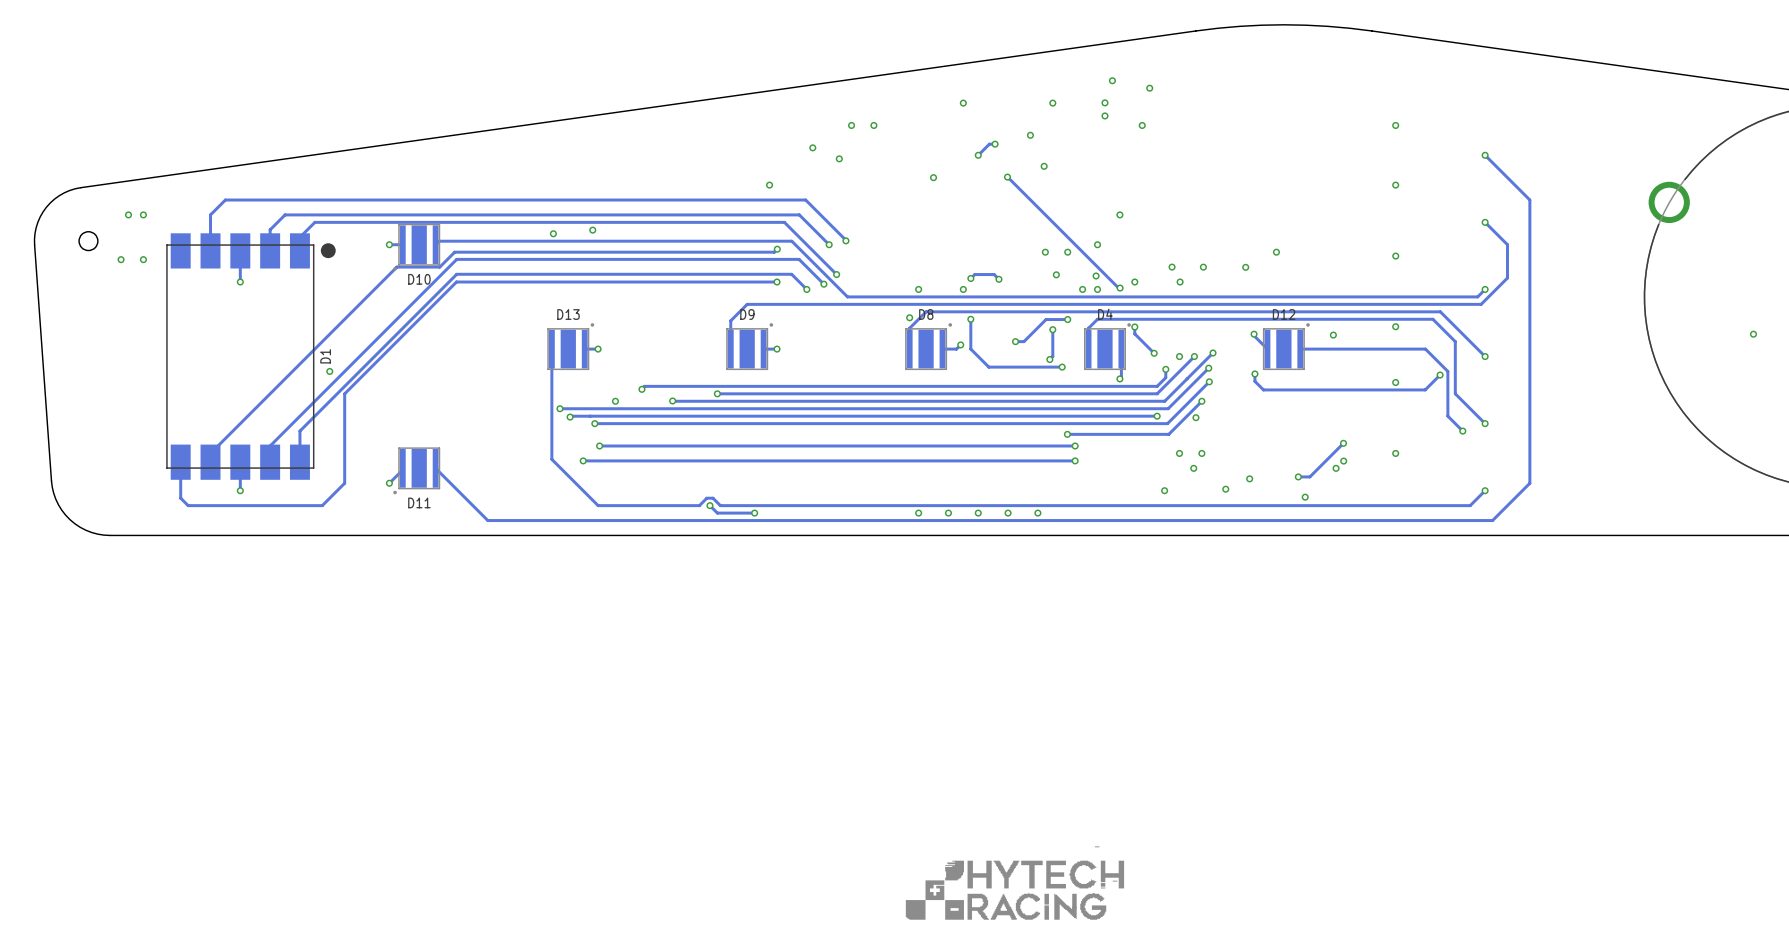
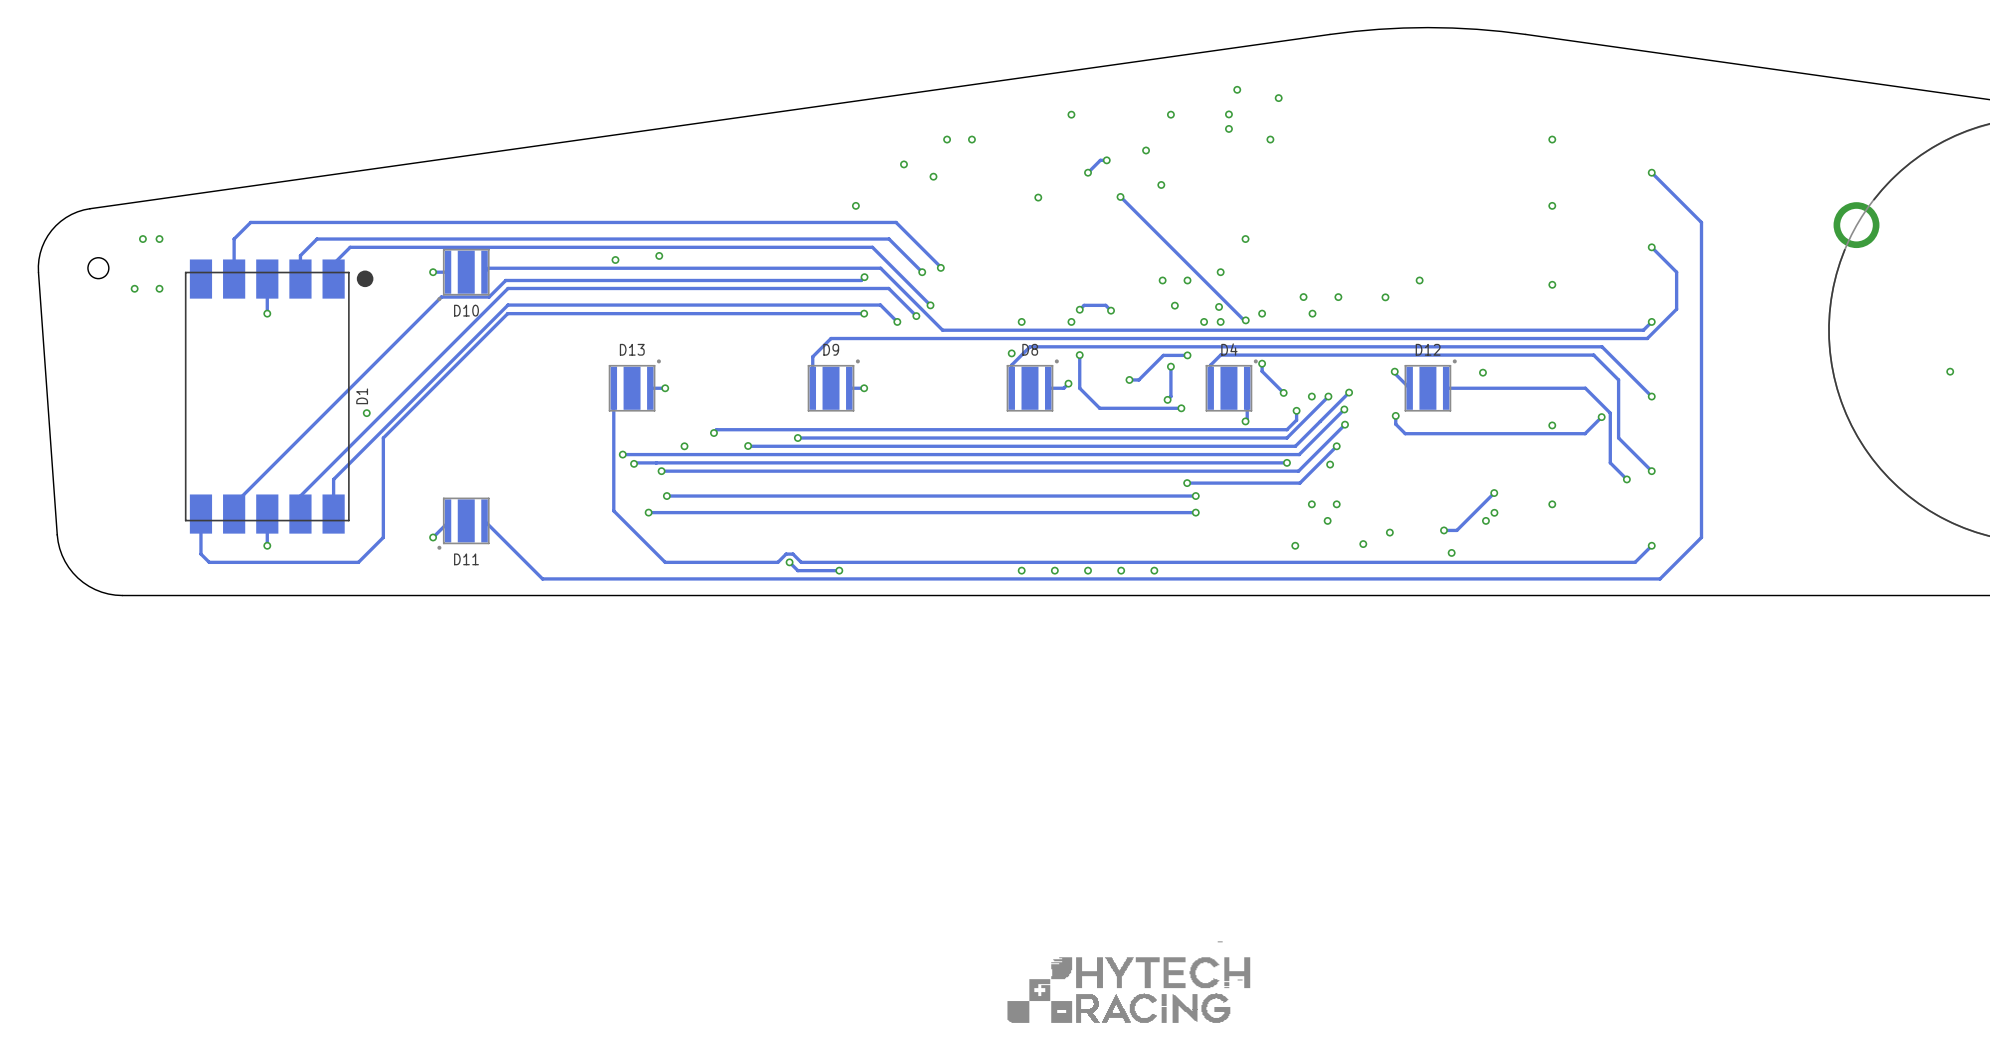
via: (1395, 326) -> none

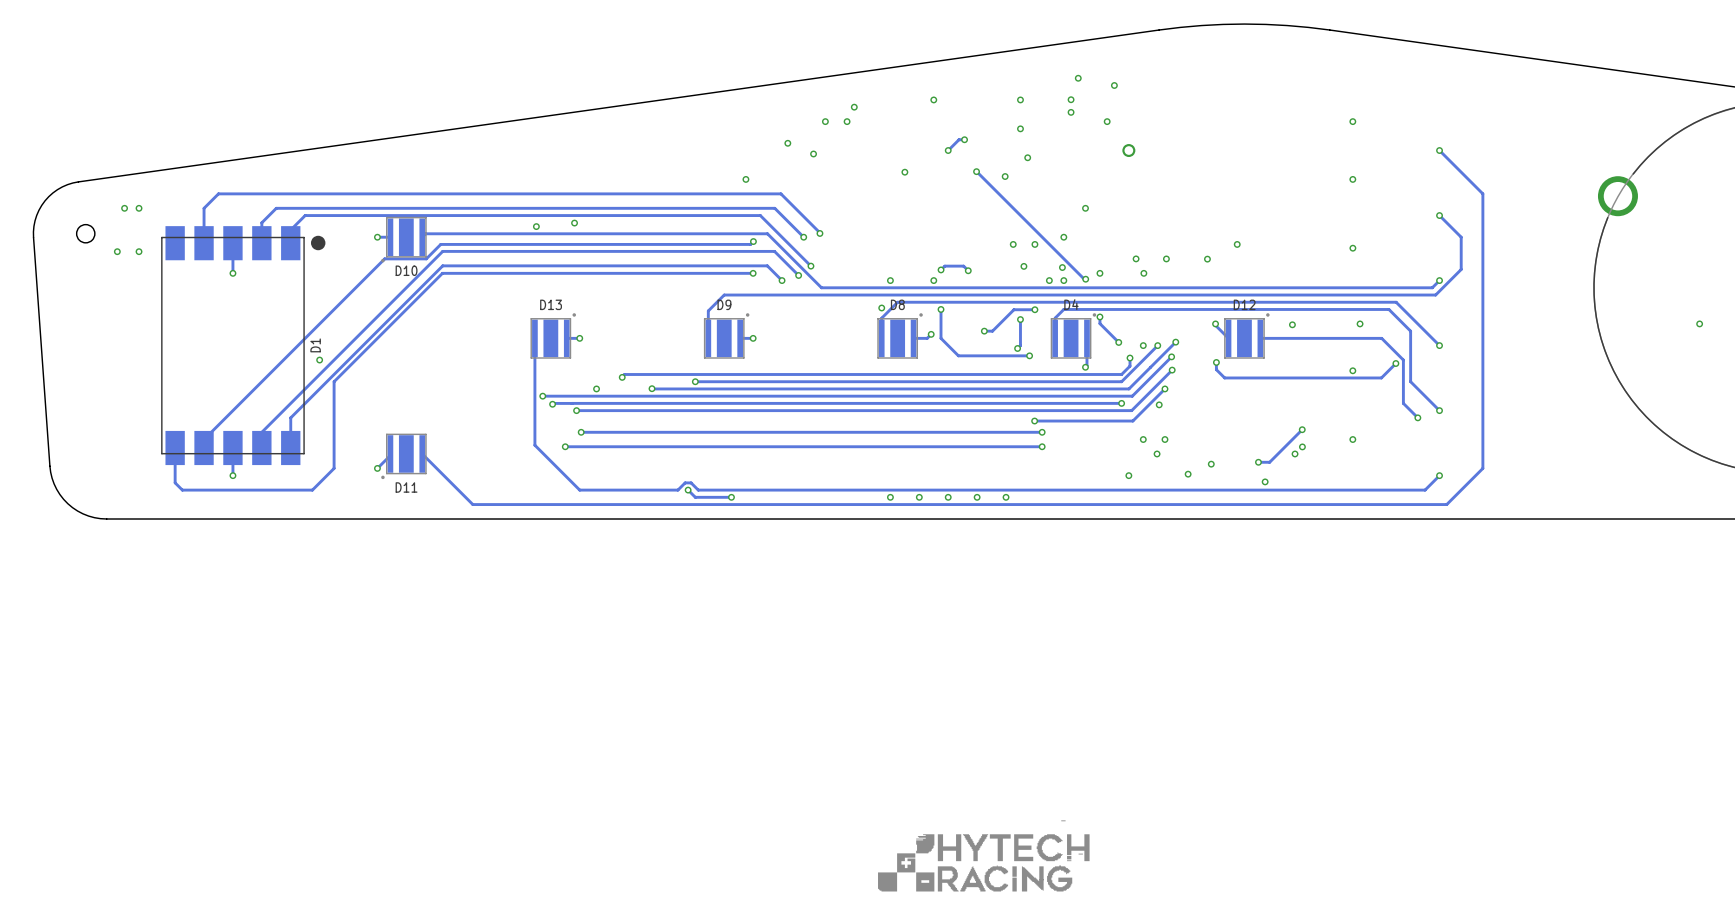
via: none -> (854, 107)
via: none -> (1020, 128)
via: (1146, 150) -> none
via: none -> (1128, 150)
via: none -> (1027, 157)
via: (1161, 184) -> none
via: none -> (1005, 176)
via: none -> (1360, 323)

